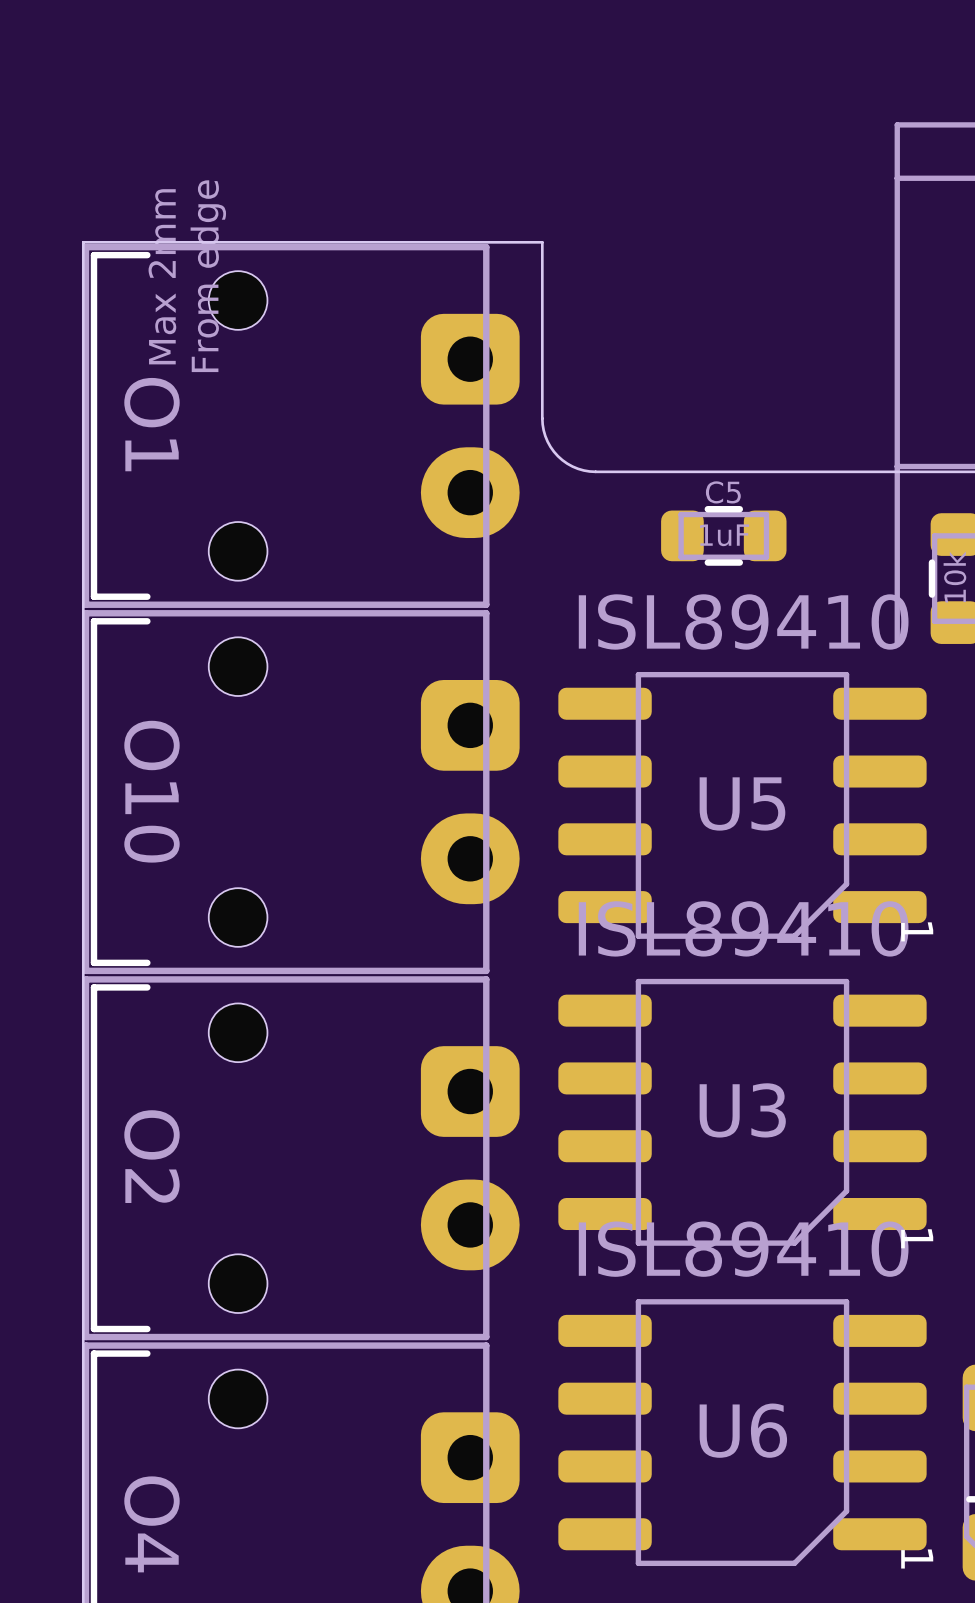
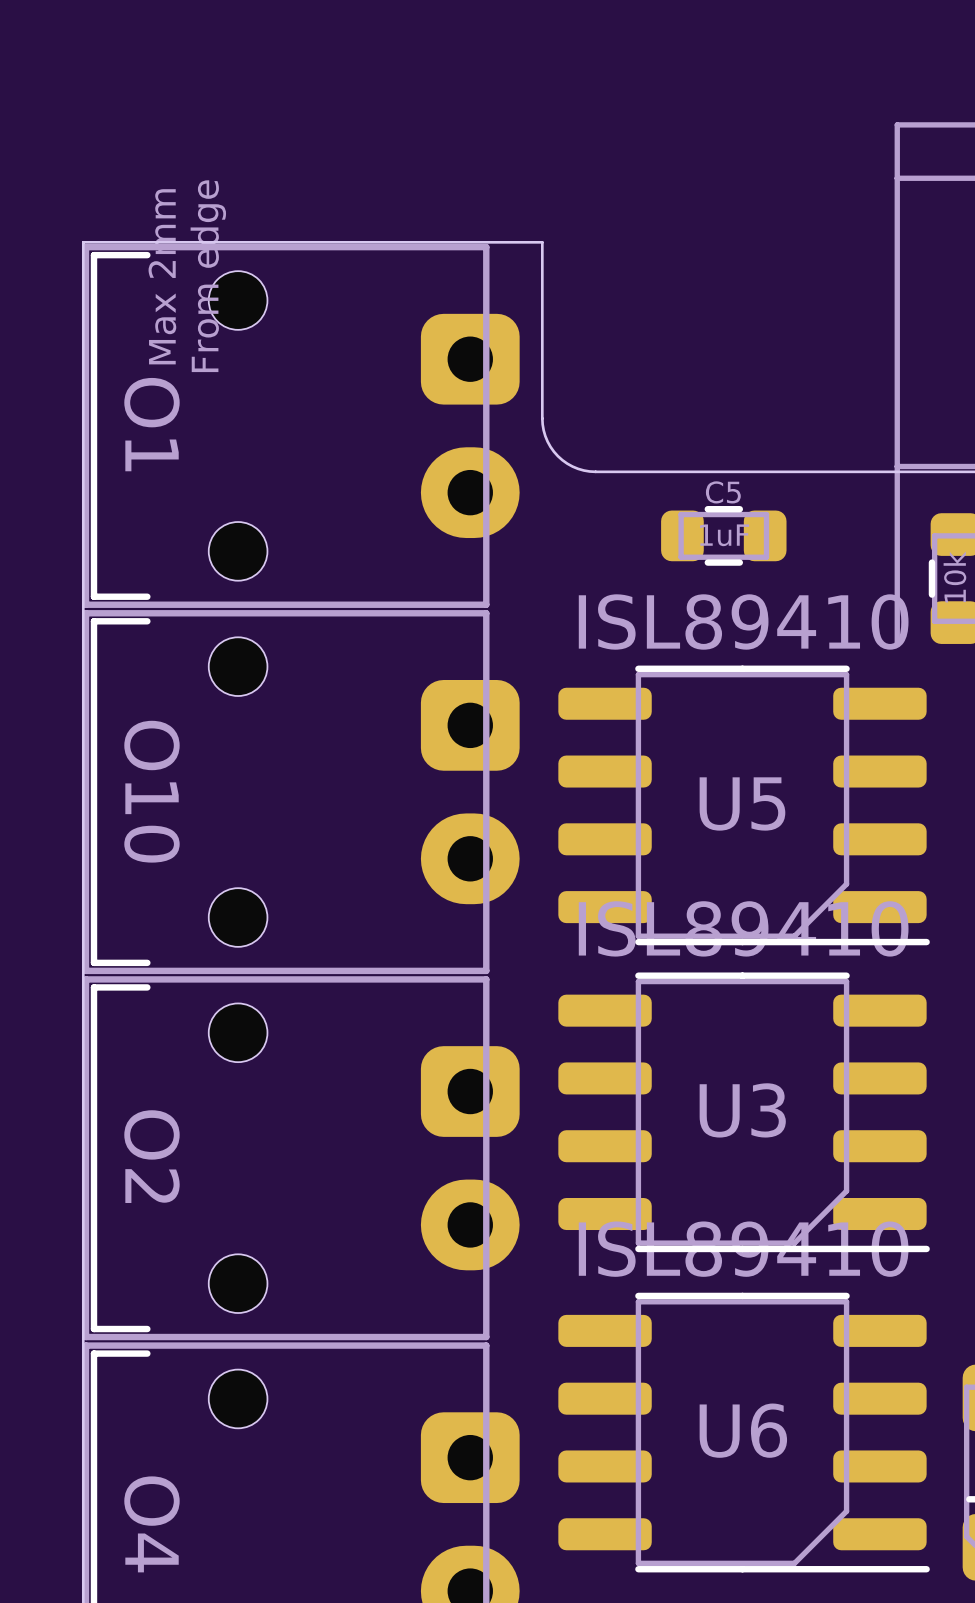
U5 footprint: [558, 671, 927, 939] -> [558, 665, 930, 946]
U3 footprint: [558, 978, 927, 1246] -> [558, 972, 930, 1253]
U6 footprint: [558, 1299, 927, 1567] -> [558, 1292, 930, 1573]

